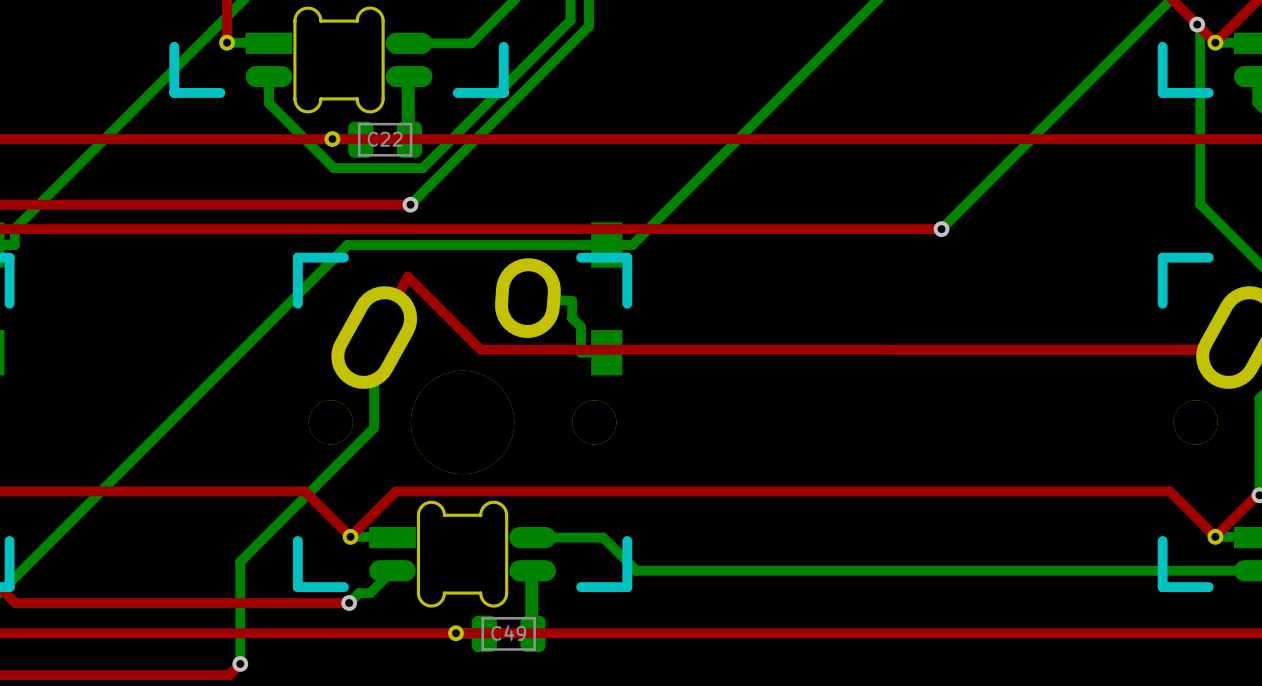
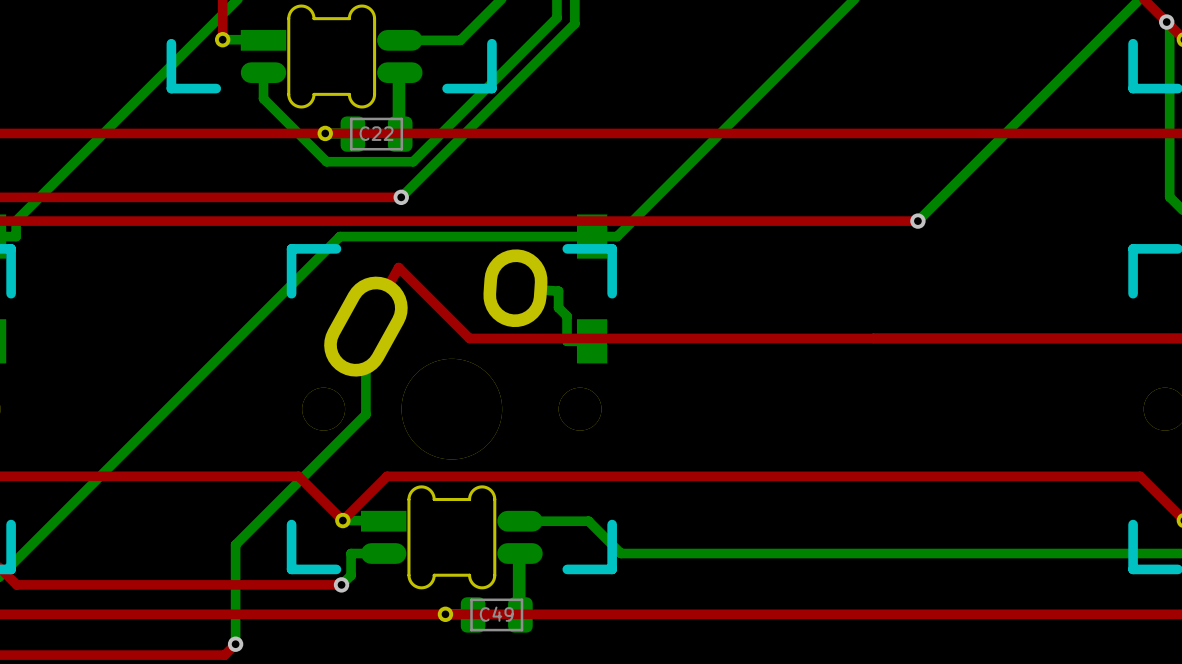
bottom track: (392, 570) (370, 593) (358, 593) -> (383, 553) (351, 553) (351, 575)

